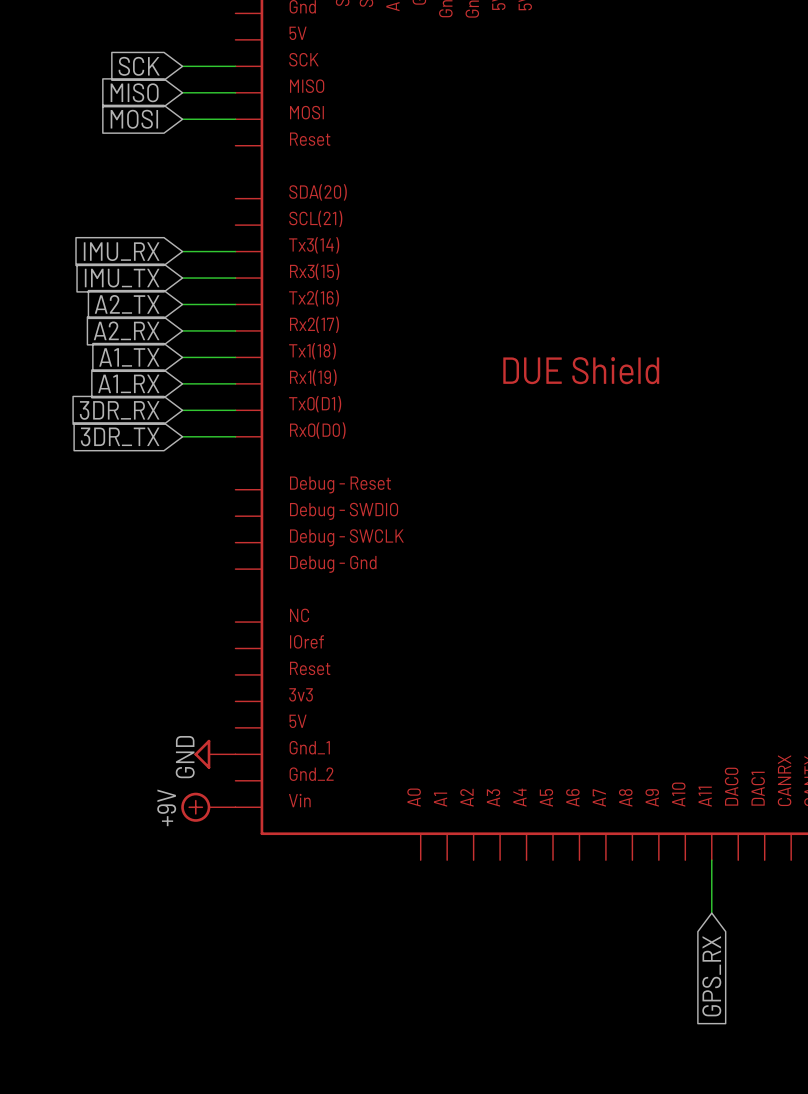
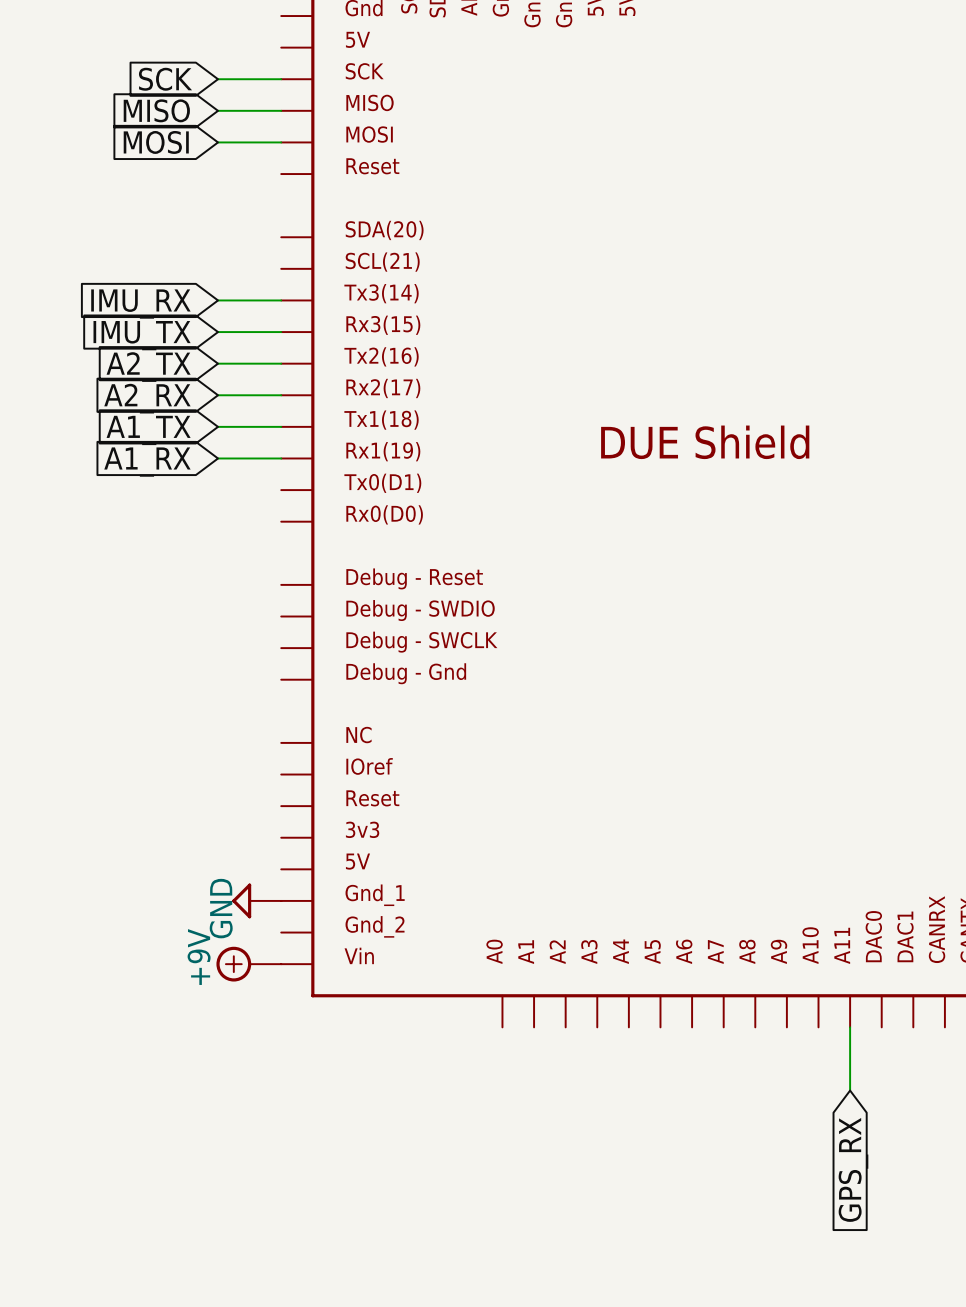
global label: 3DR_RX (119, 410) -> none
wire: (182, 410) (235, 410) -> none
global label: 3DR_TX (120, 436) -> none
wire: (182, 436) (235, 436) -> none

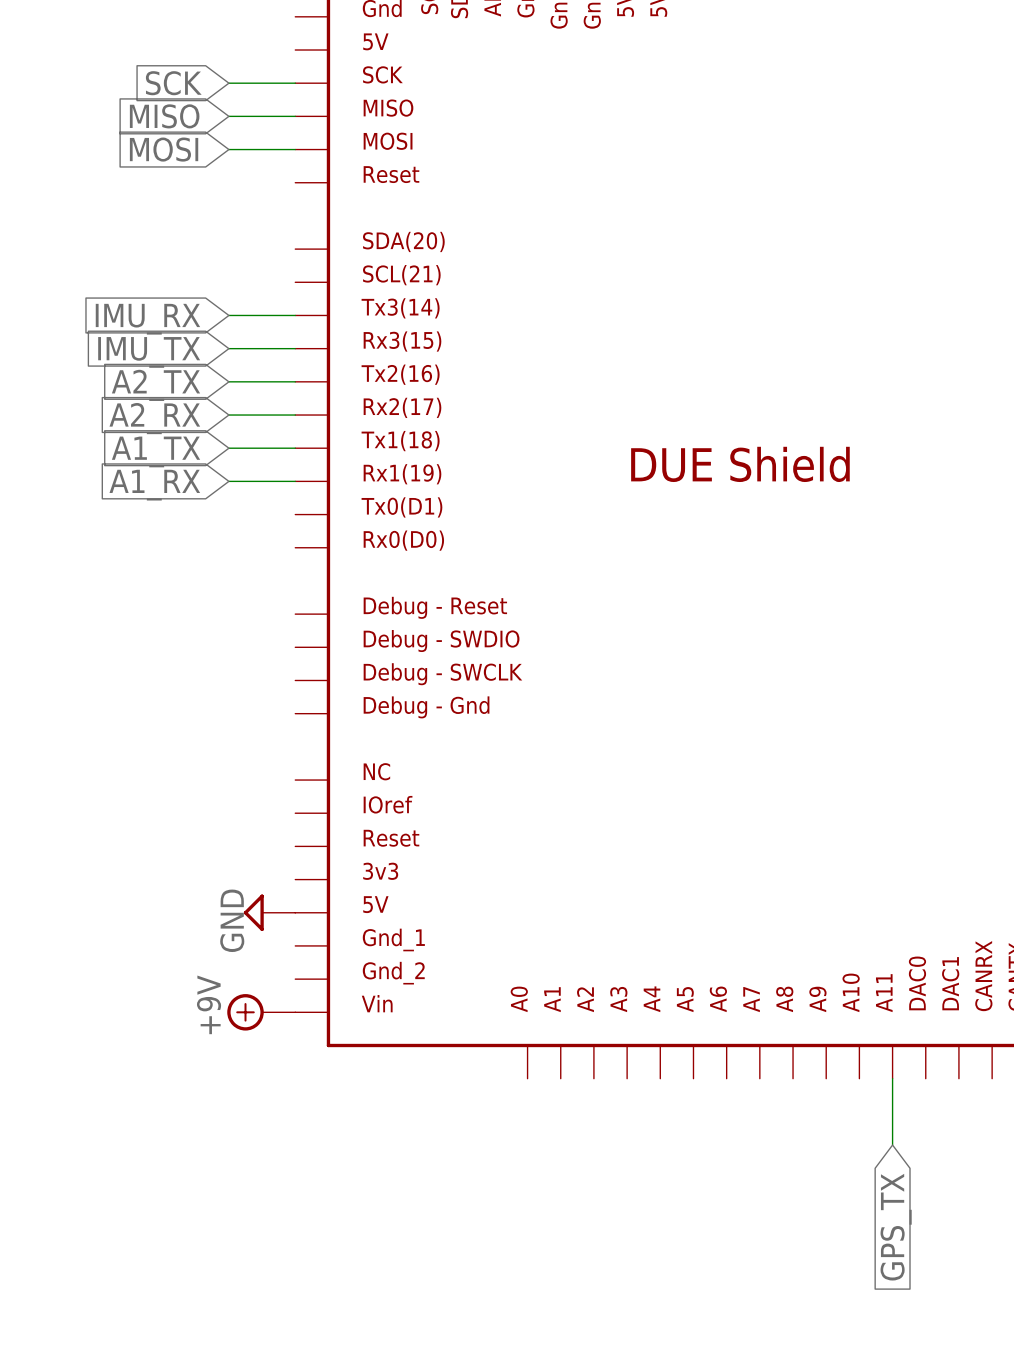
power symbol position: GND (256, 900) -> GND (269, 912)
global label: GPS_RX (853, 1169) -> GPS_TX (896, 1227)

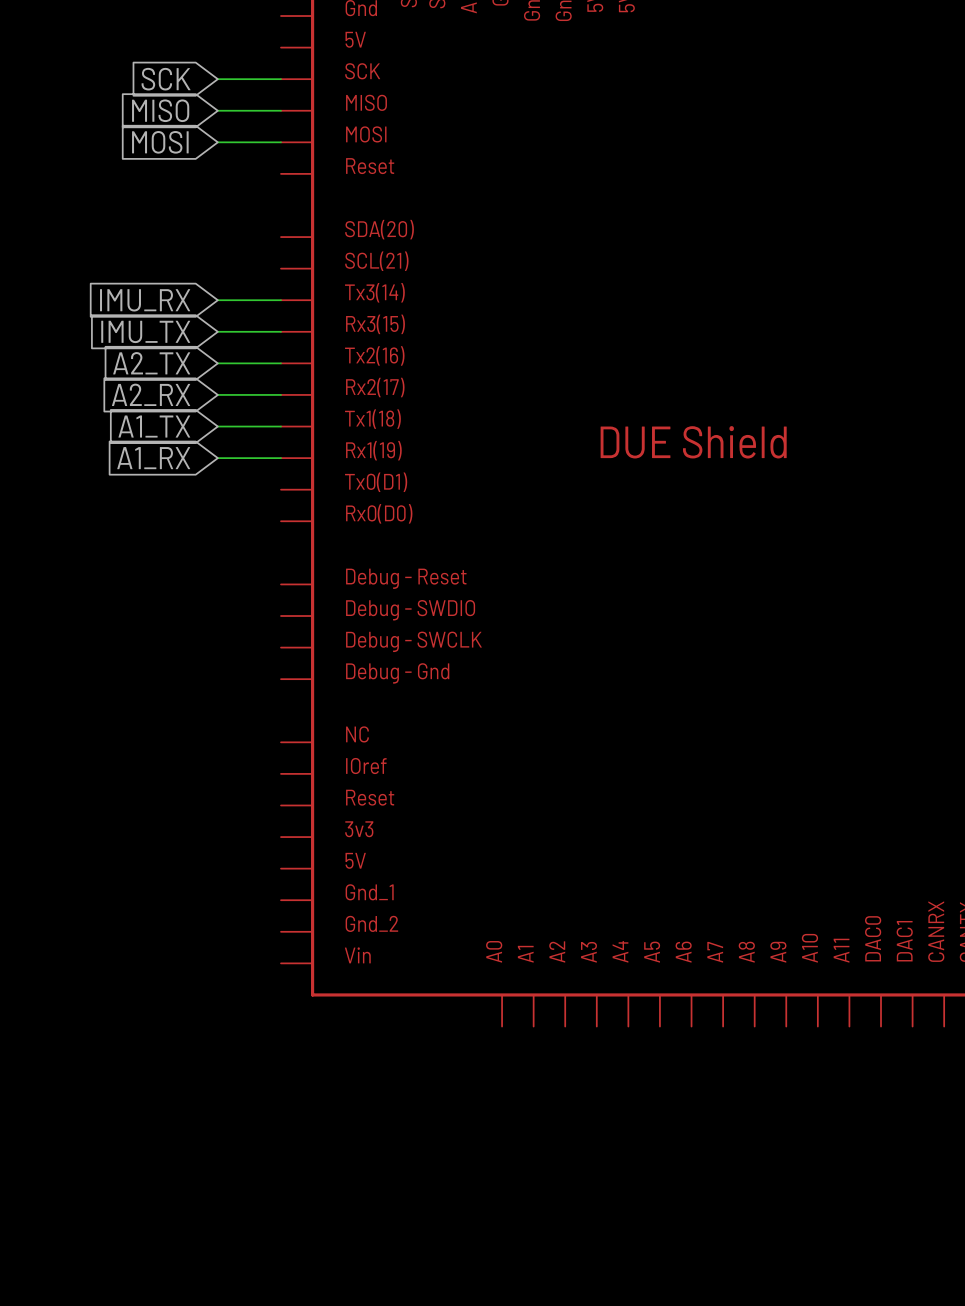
power symbol: GND (269, 912) -> none
power symbol: +9V (261, 1012) -> none
wire: (892, 1078) (892, 1145) -> none
global label: GPS_TX (896, 1227) -> none

